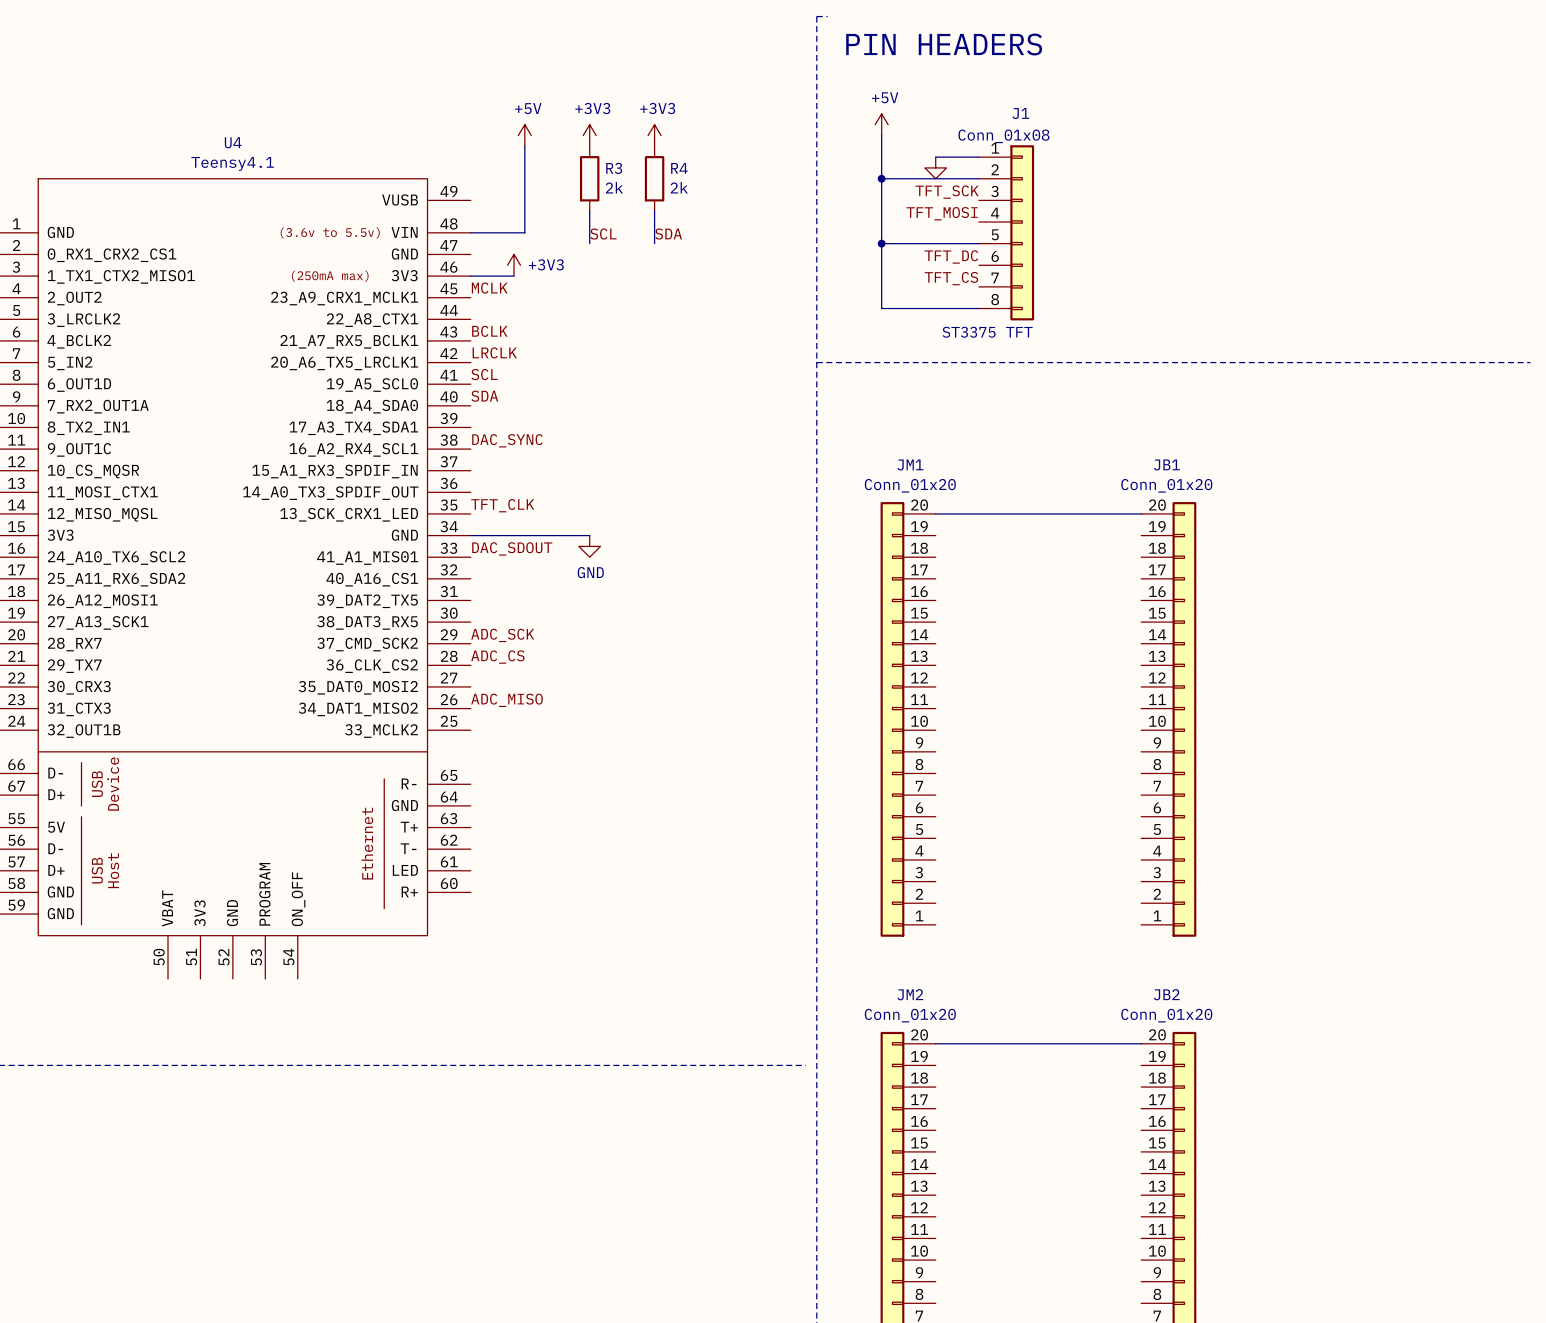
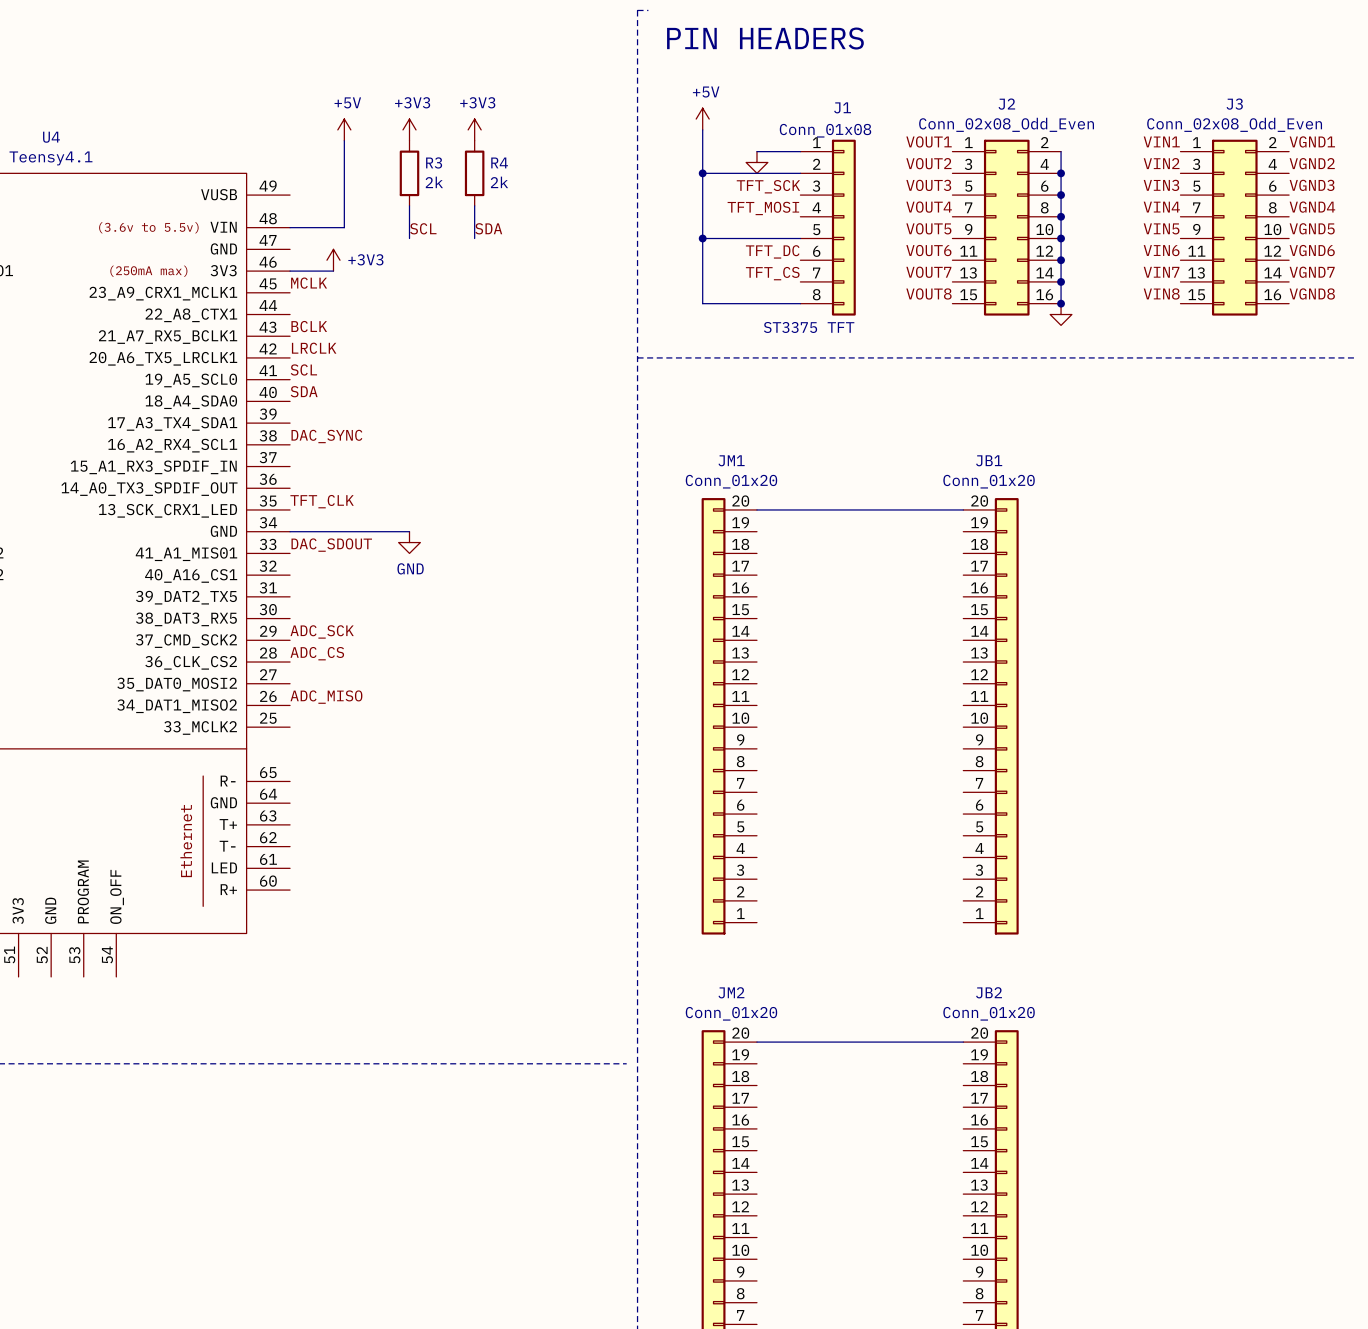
label: none -> VOUT1 (929, 141)
label: none -> VIN1 (1161, 141)
label: none -> VGND1 (1312, 141)
wire: none -> (1061, 151) (1061, 303)
label: none -> VOUT2 (928, 163)
label: none -> VIN2 (1161, 163)
label: none -> VGND2 (1312, 163)
junction: none -> (1061, 173)
label: none -> VOUT3 (928, 185)
label: none -> VIN3 (1161, 185)
label: none -> VGND3 (1312, 185)
junction: none -> (1061, 195)
label: none -> VOUT4 (929, 207)
label: none -> VIN4 (1161, 207)
label: none -> VGND4 (1312, 207)
junction: none -> (1061, 216)
J2: none -> Conn_02x08_Odd_Even (1006, 227)
J3: none -> Conn_02x08_Odd_Even (1234, 227)
label: none -> VOUT5 (928, 228)
label: none -> VGND5 (1312, 228)
label: none -> VIN5 (1161, 228)
junction: none -> (1061, 238)
label: none -> VOUT6 (928, 250)
label: none -> VIN6 (1161, 250)
label: none -> VGND6 (1312, 250)
junction: none -> (1061, 260)
label: none -> VOUT7 (928, 272)
label: none -> VIN7 (1161, 272)
label: none -> VGND7 (1312, 272)
junction: none -> (1061, 281)
label: none -> VOUT8 (928, 293)
label: none -> VIN8 (1161, 293)
label: none -> VGND8 (1312, 293)
junction: none -> (1061, 303)
power symbol: none -> (1061, 314)

